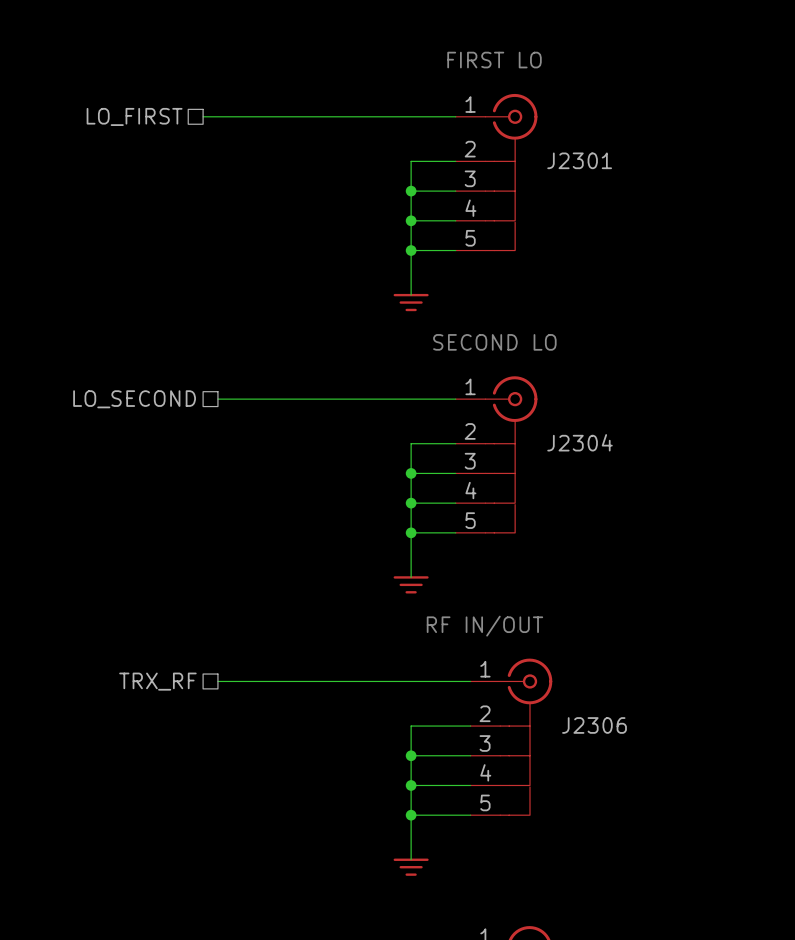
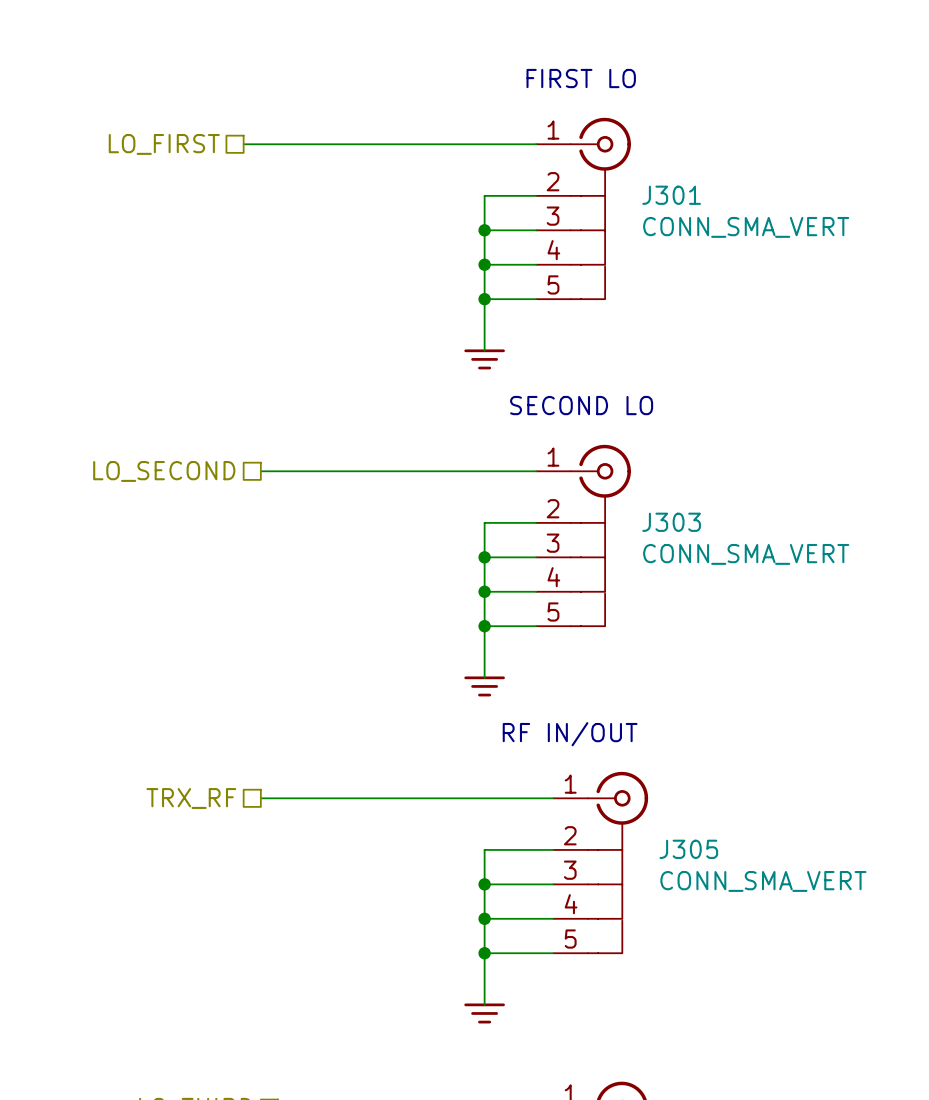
J2301 name: J2301 (579, 160) -> J301 (671, 195)
J2301 value: none -> CONN_SMA_VERT (746, 227)
J2304 name: J2304 (579, 442) -> J303 (671, 522)
J2304 value: none -> CONN_SMA_VERT (746, 554)
J2306 name: J2306 (594, 725) -> J305 (688, 849)
J2306 value: none -> CONN_SMA_VERT (763, 881)

